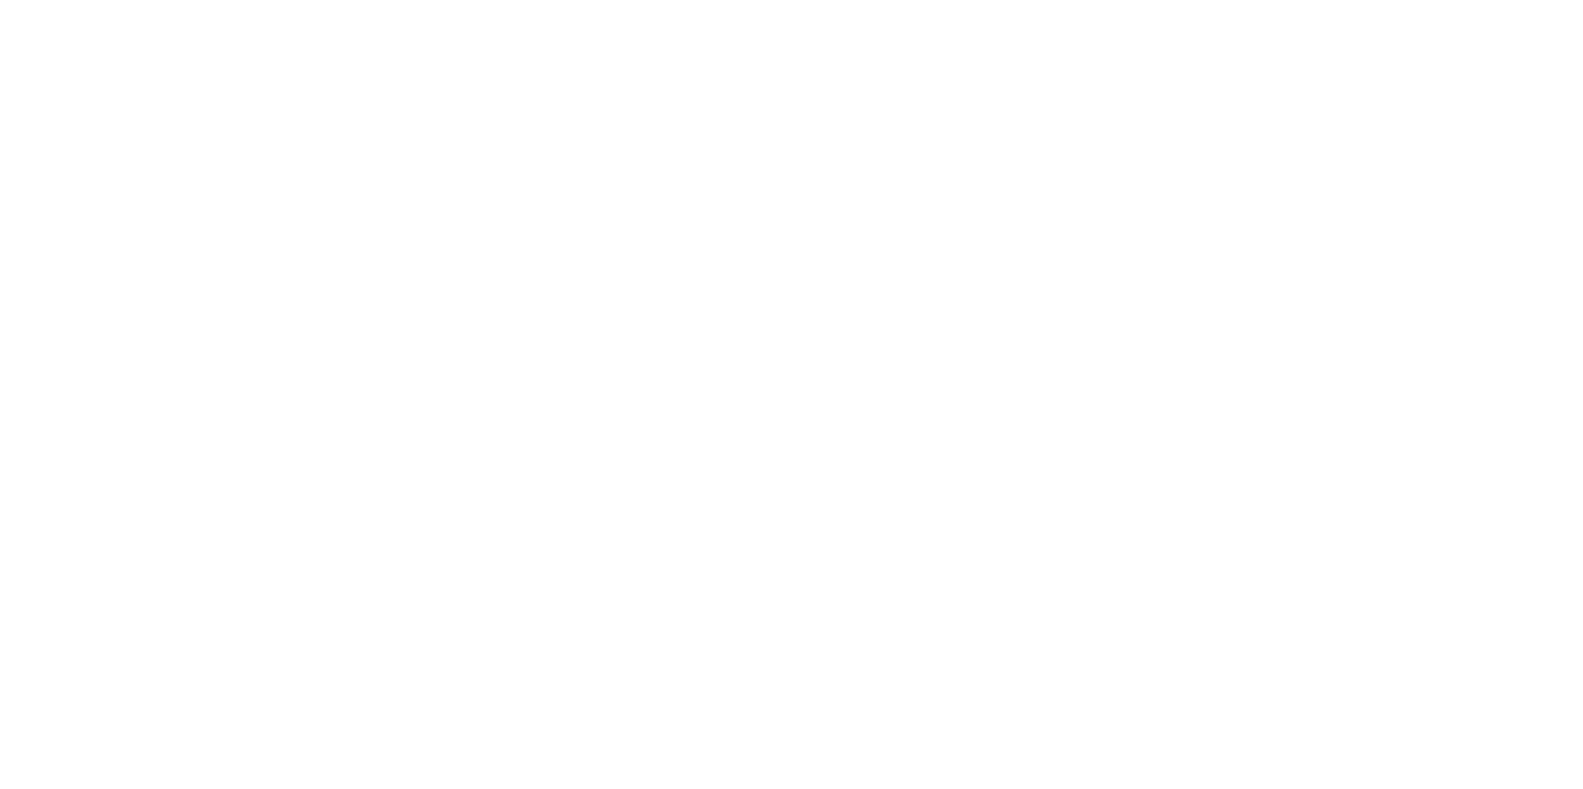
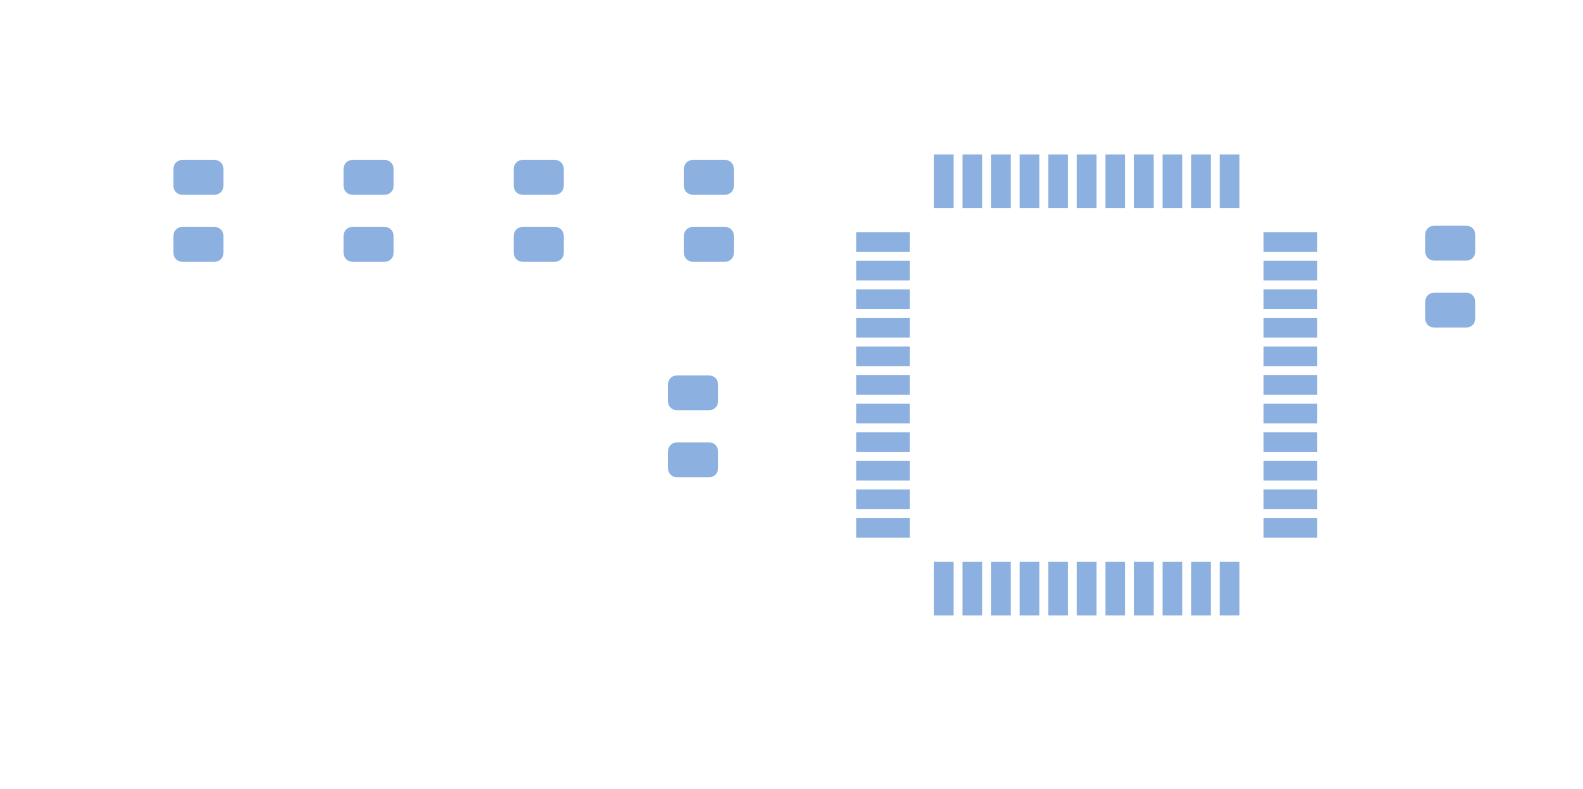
part: none -> (198, 210)
part: none -> (368, 210)
part: none -> (538, 210)
part: none -> (708, 210)
part: none -> (1450, 276)
part: none -> (1086, 384)
part: none -> (693, 426)

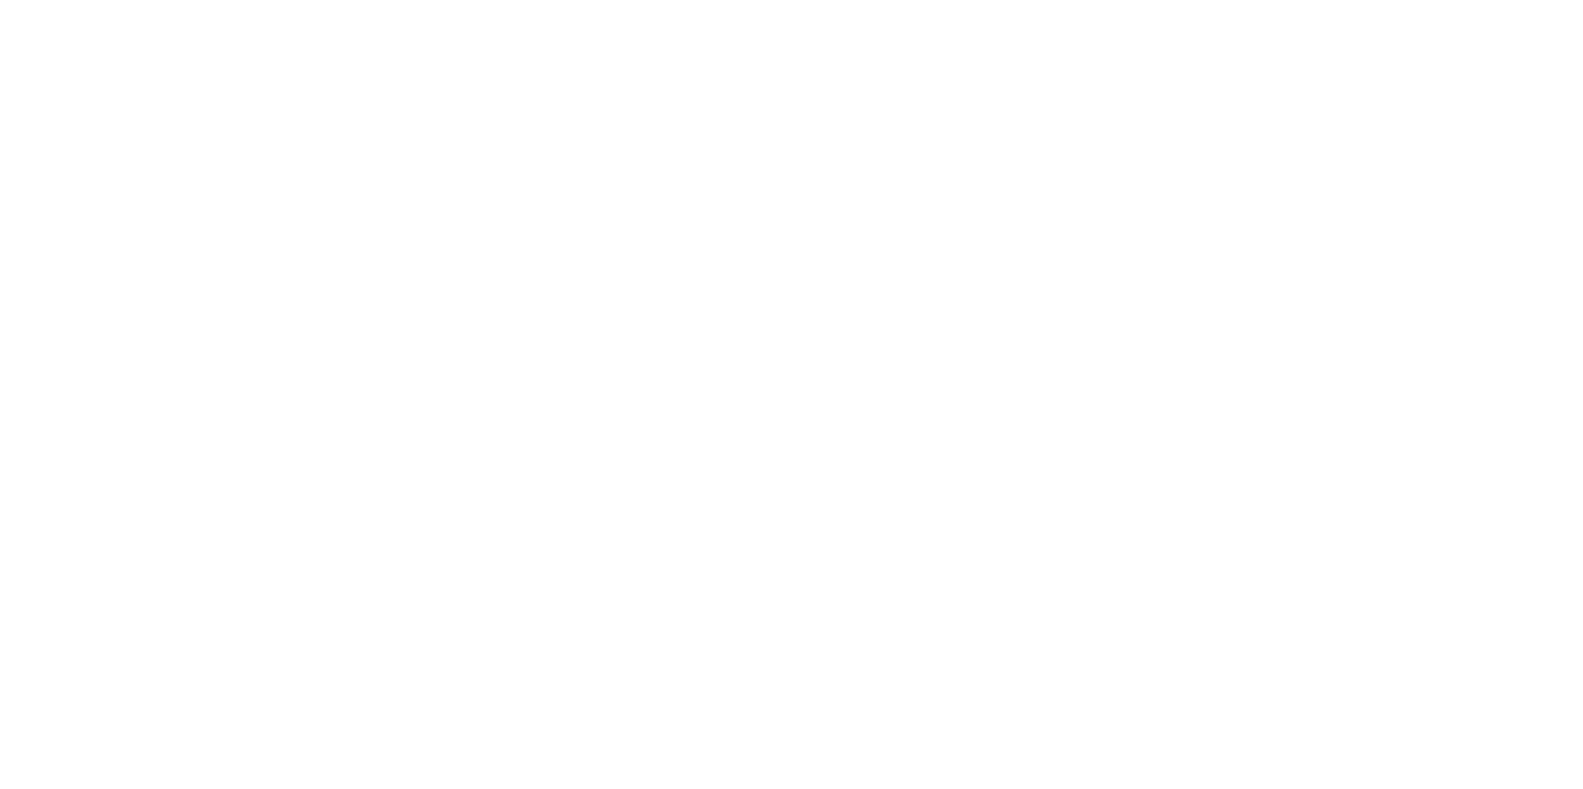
part: (198, 210) -> none
part: (368, 210) -> none
part: (538, 210) -> none
part: (708, 210) -> none
part: (1450, 276) -> none
part: (1086, 384) -> none
part: (693, 426) -> none

